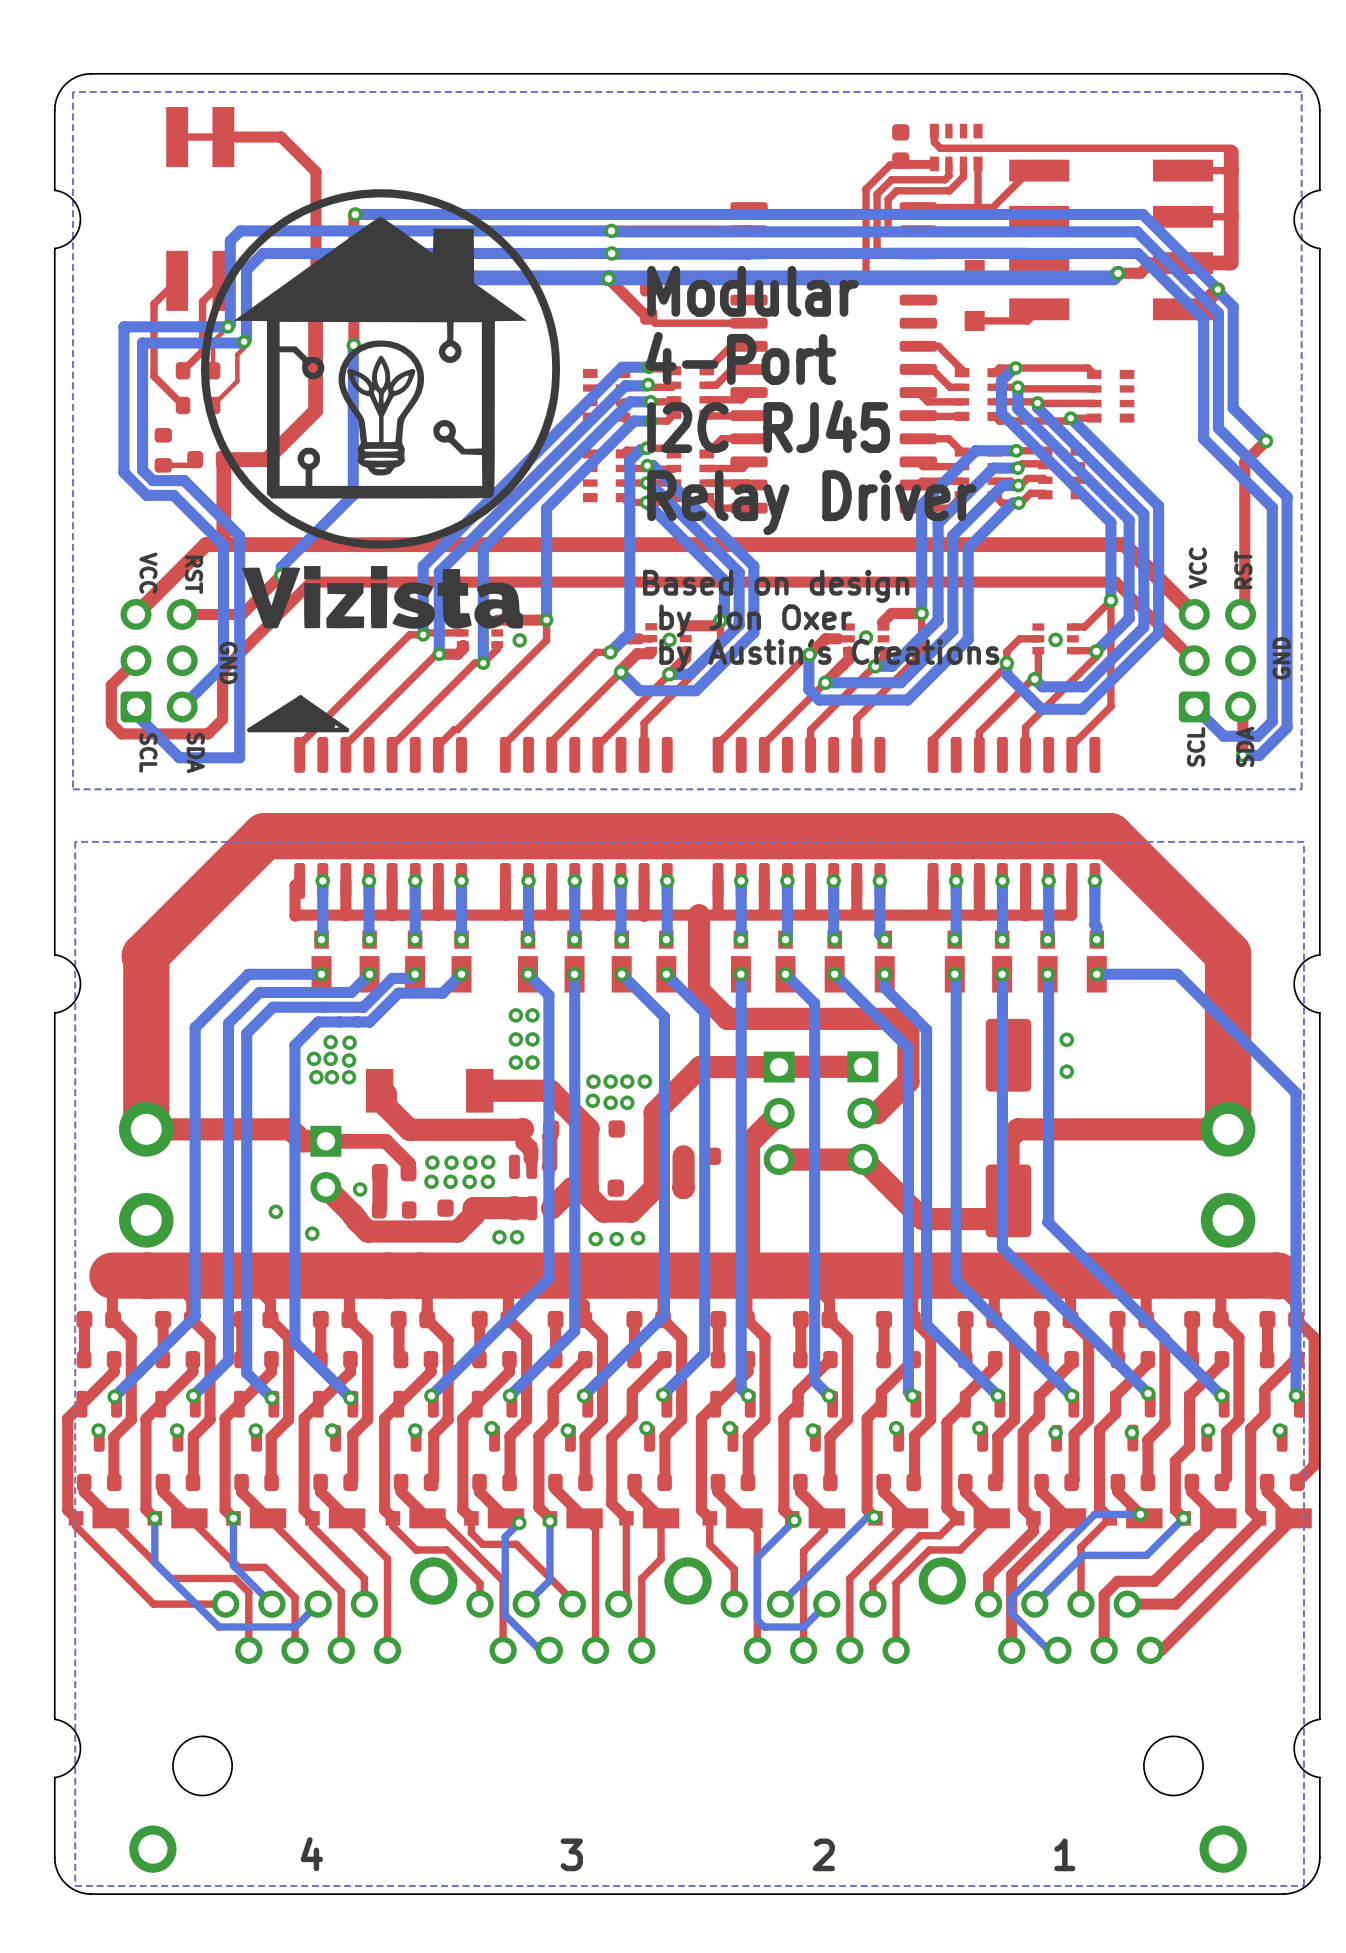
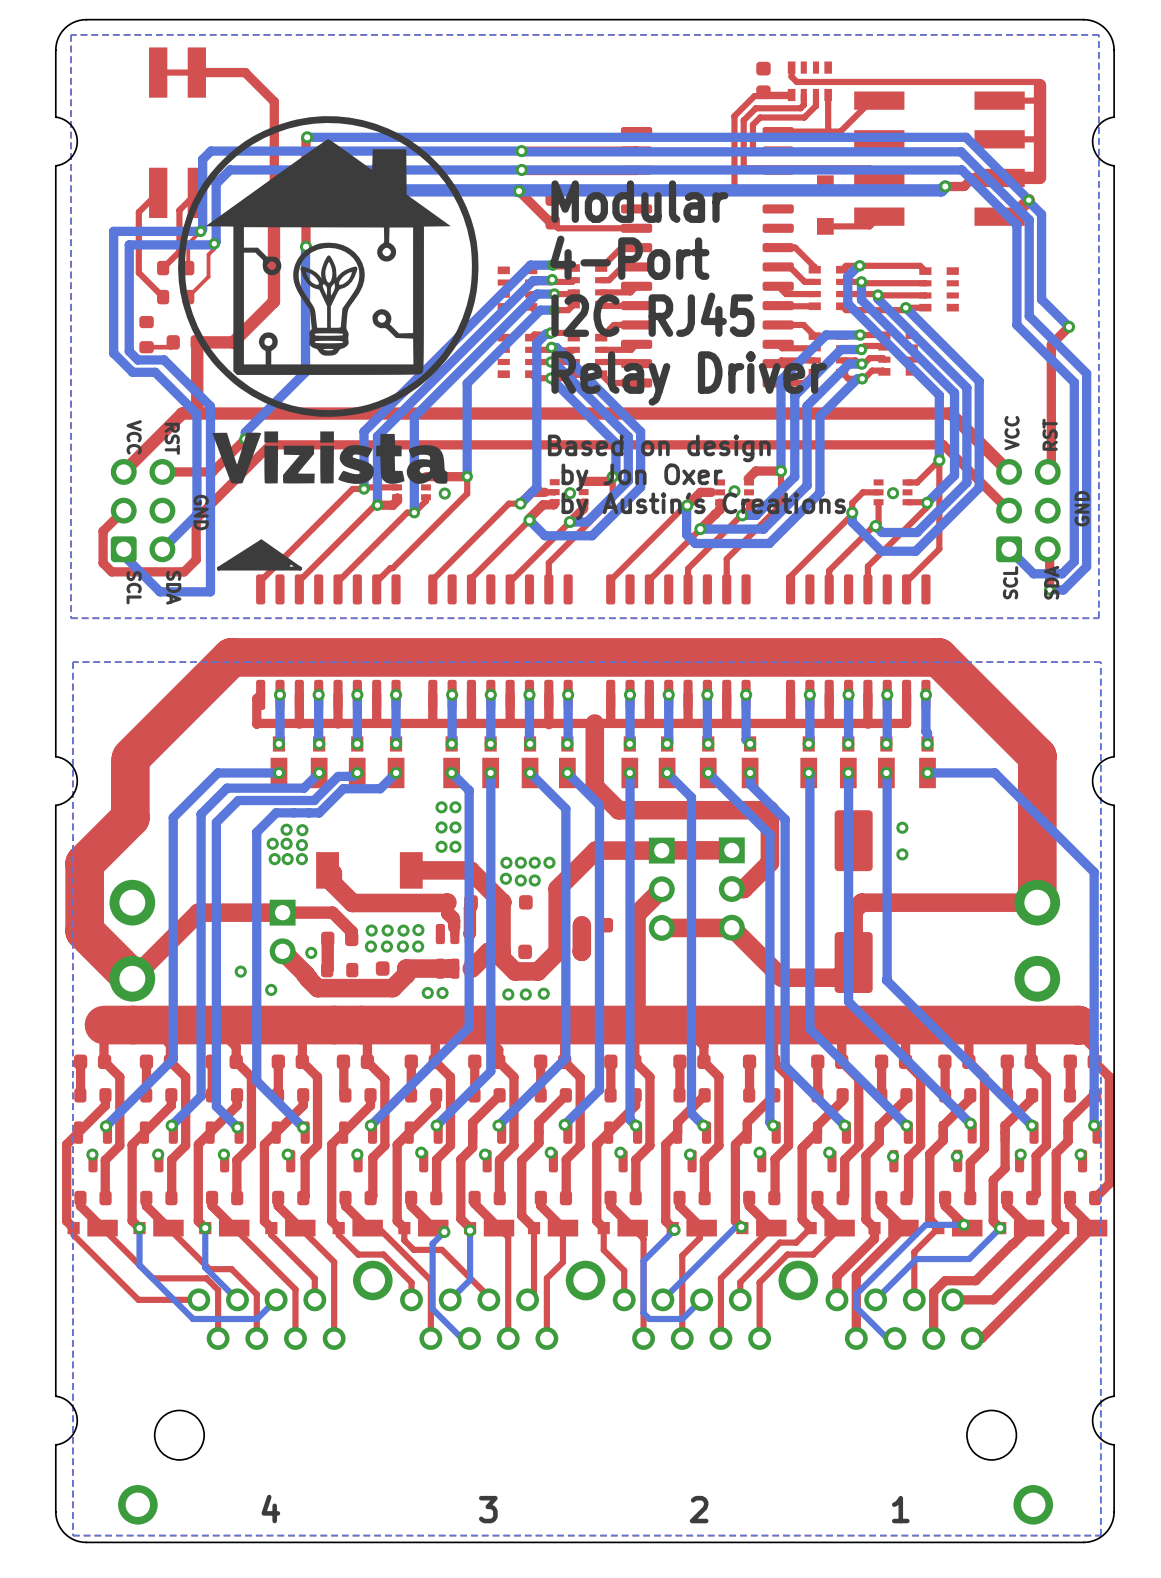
top track: (144, 956) (146, 1129) (290, 1129) (302, 1141) -> (130, 760) (130, 817) (84, 863) (84, 931) (132, 978) (198, 912) (263, 912)

